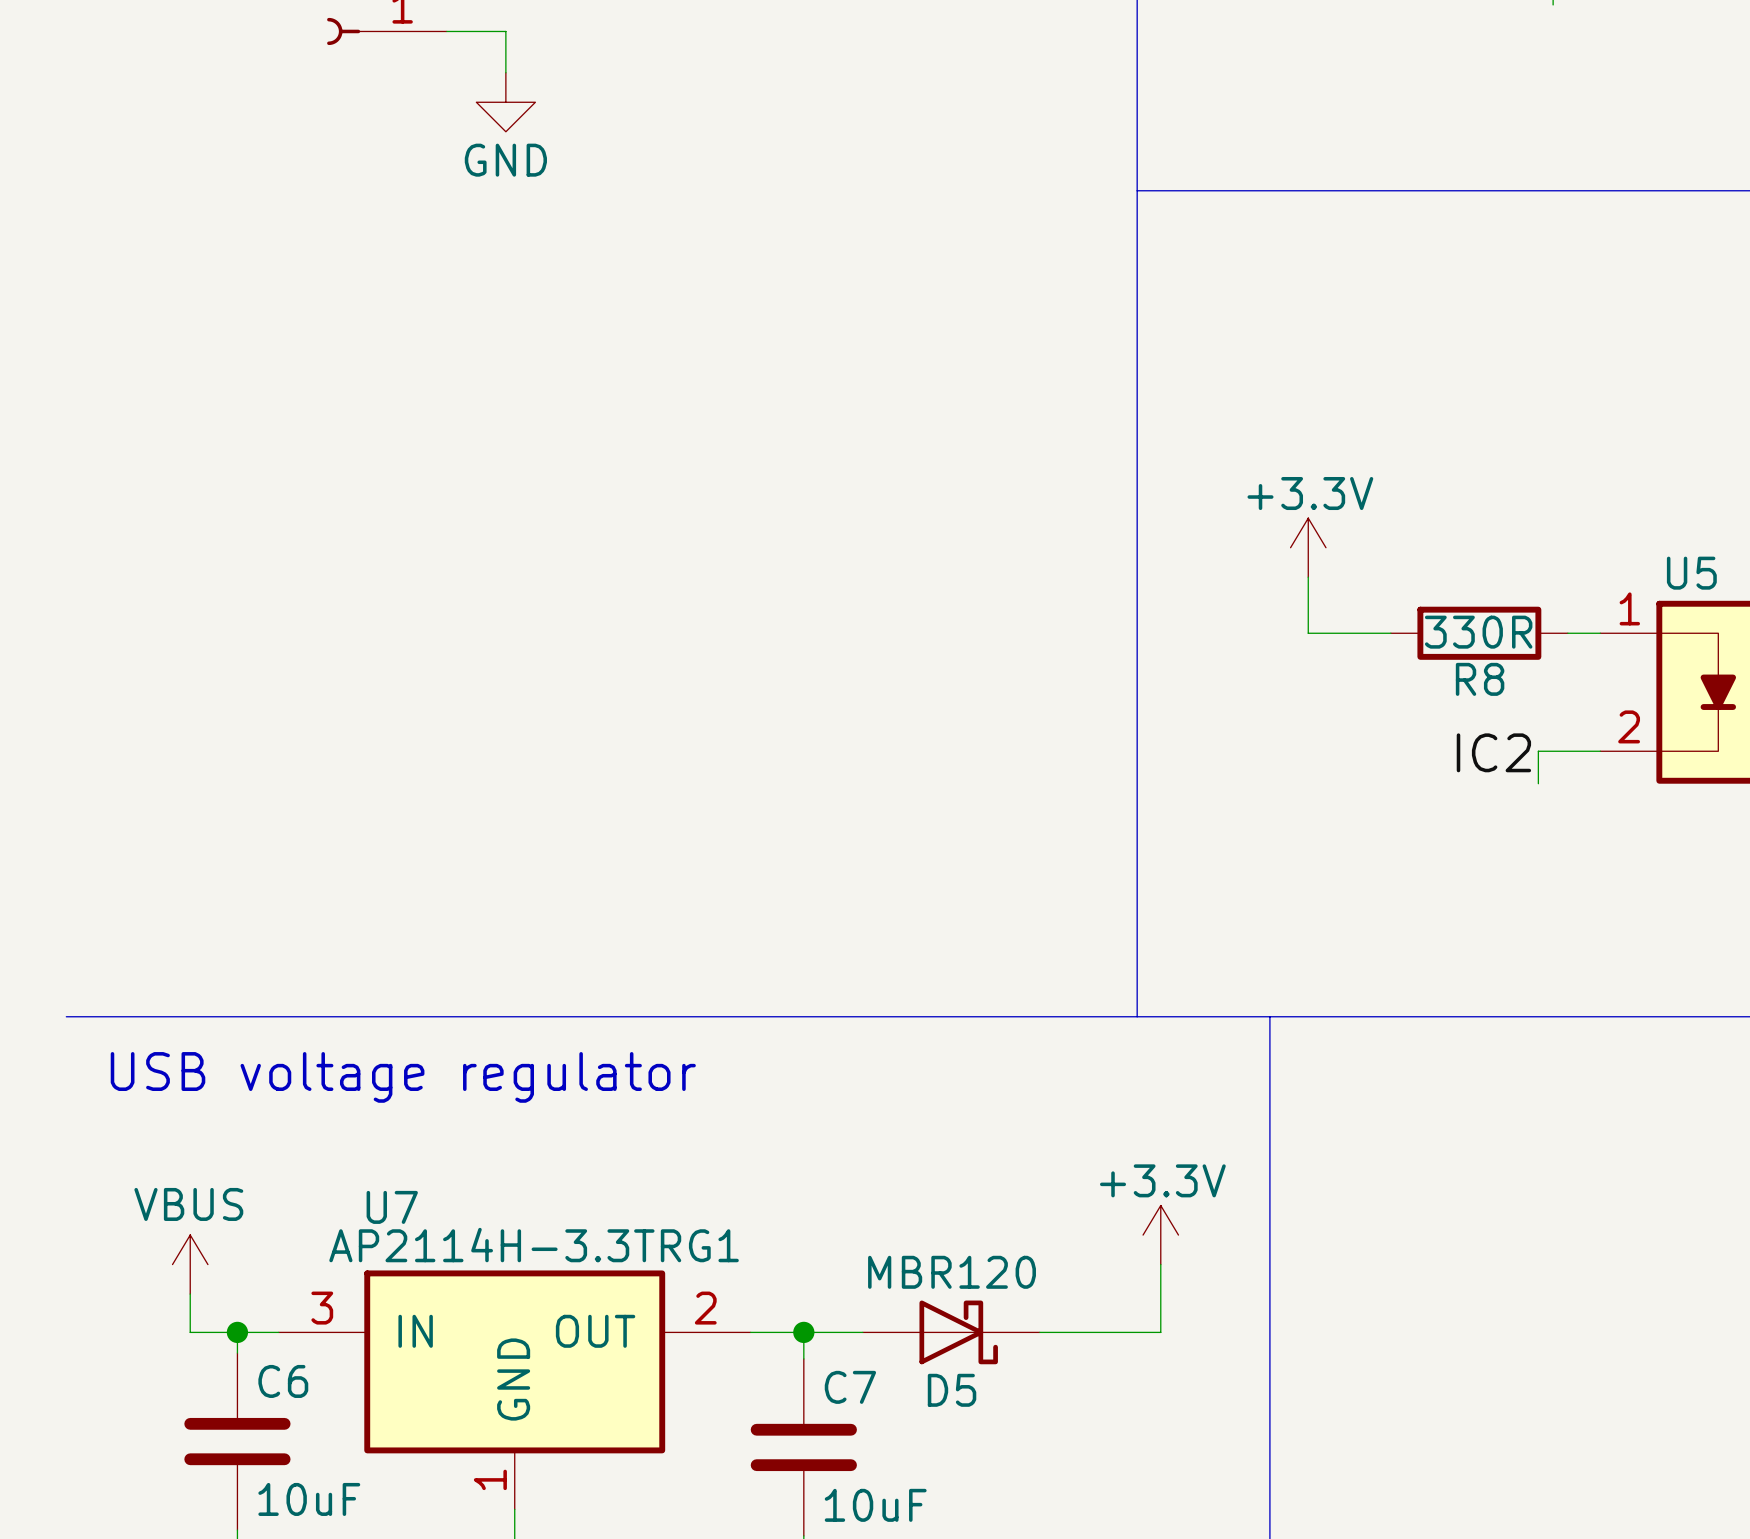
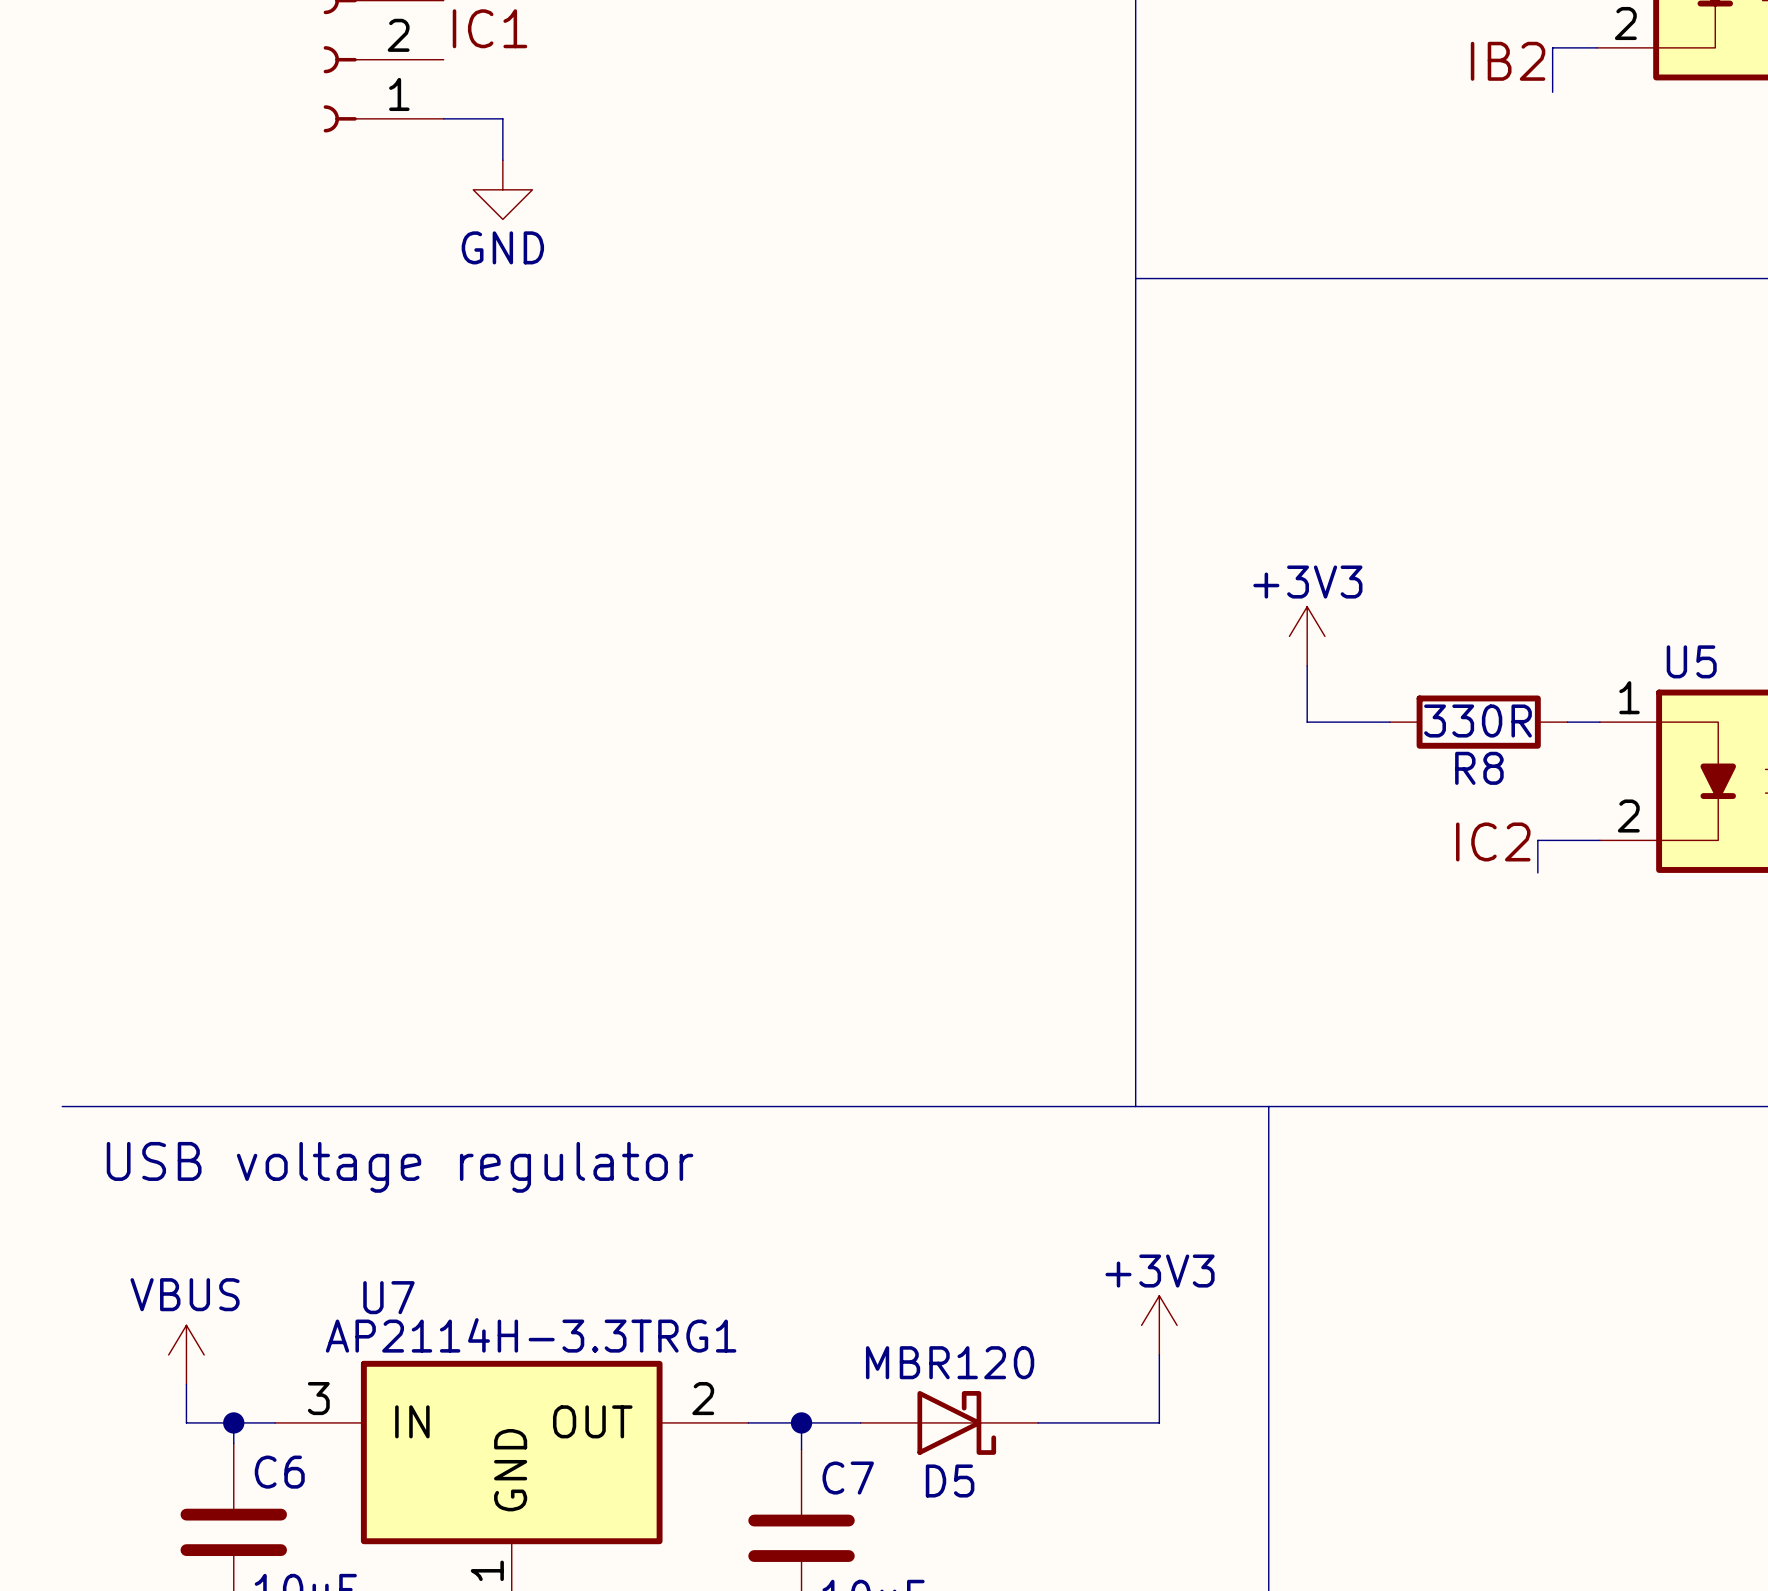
power symbol: +3.3V (1308, 547) -> +3V3 (1307, 636)
power symbol: +3.3V (1160, 1235) -> +3V3 (1159, 1325)

